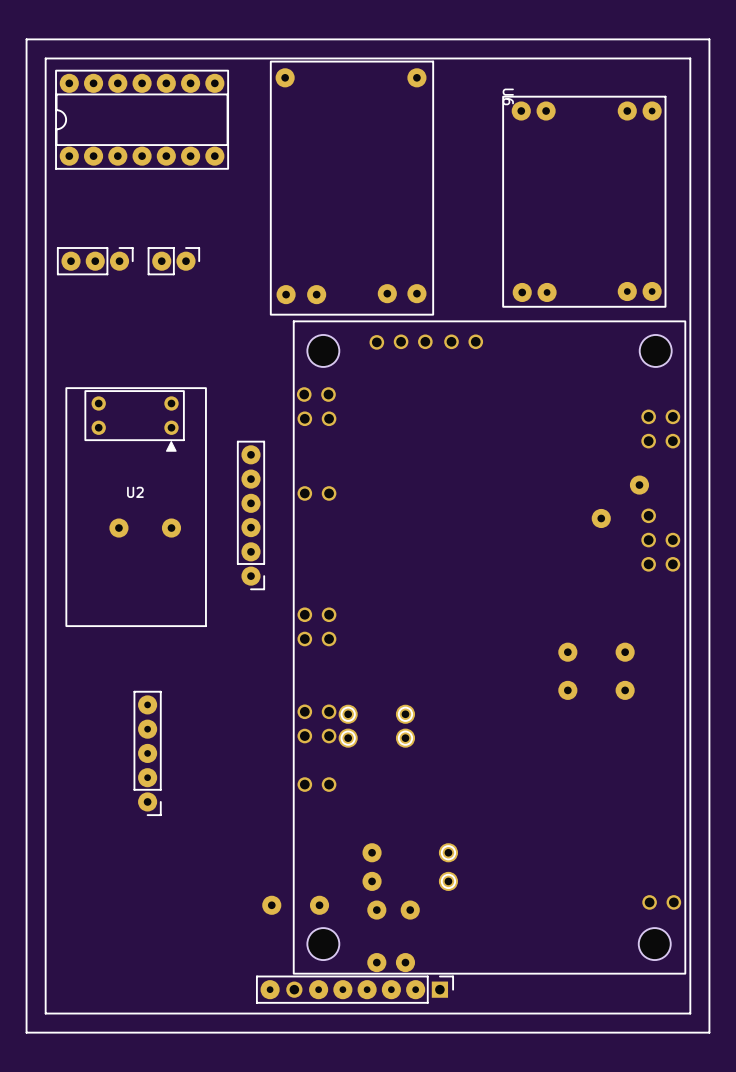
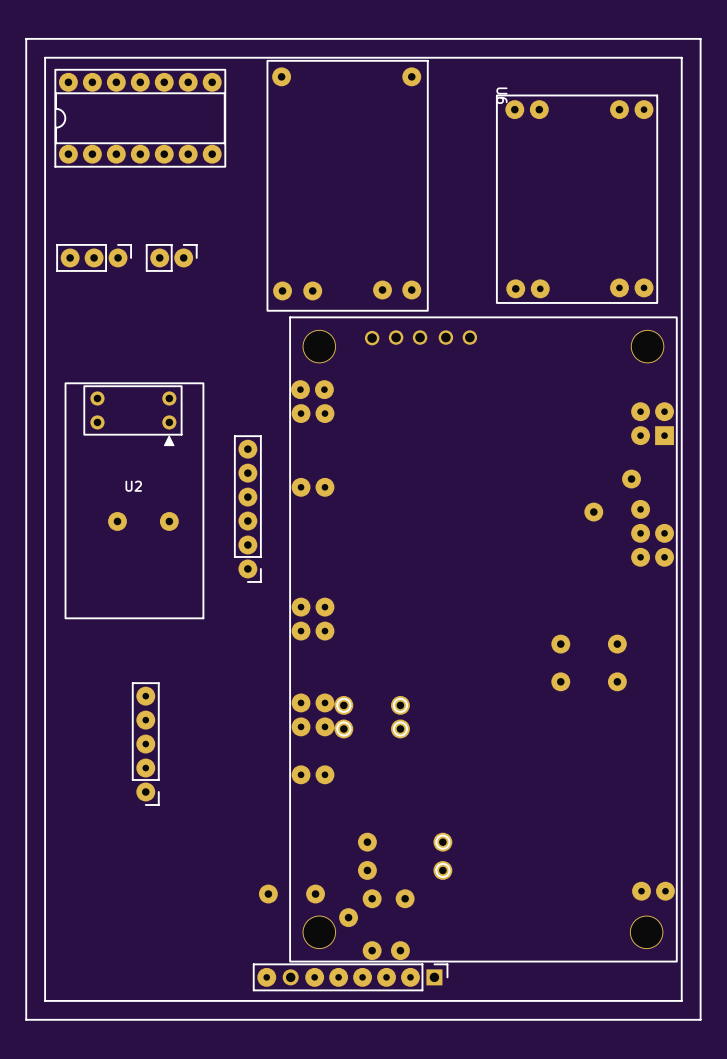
part footprint: [293, 320, 686, 975] -> [289, 316, 678, 963]
part: none -> (300, 389)
part: none -> (301, 413)
part: none -> (348, 917)

